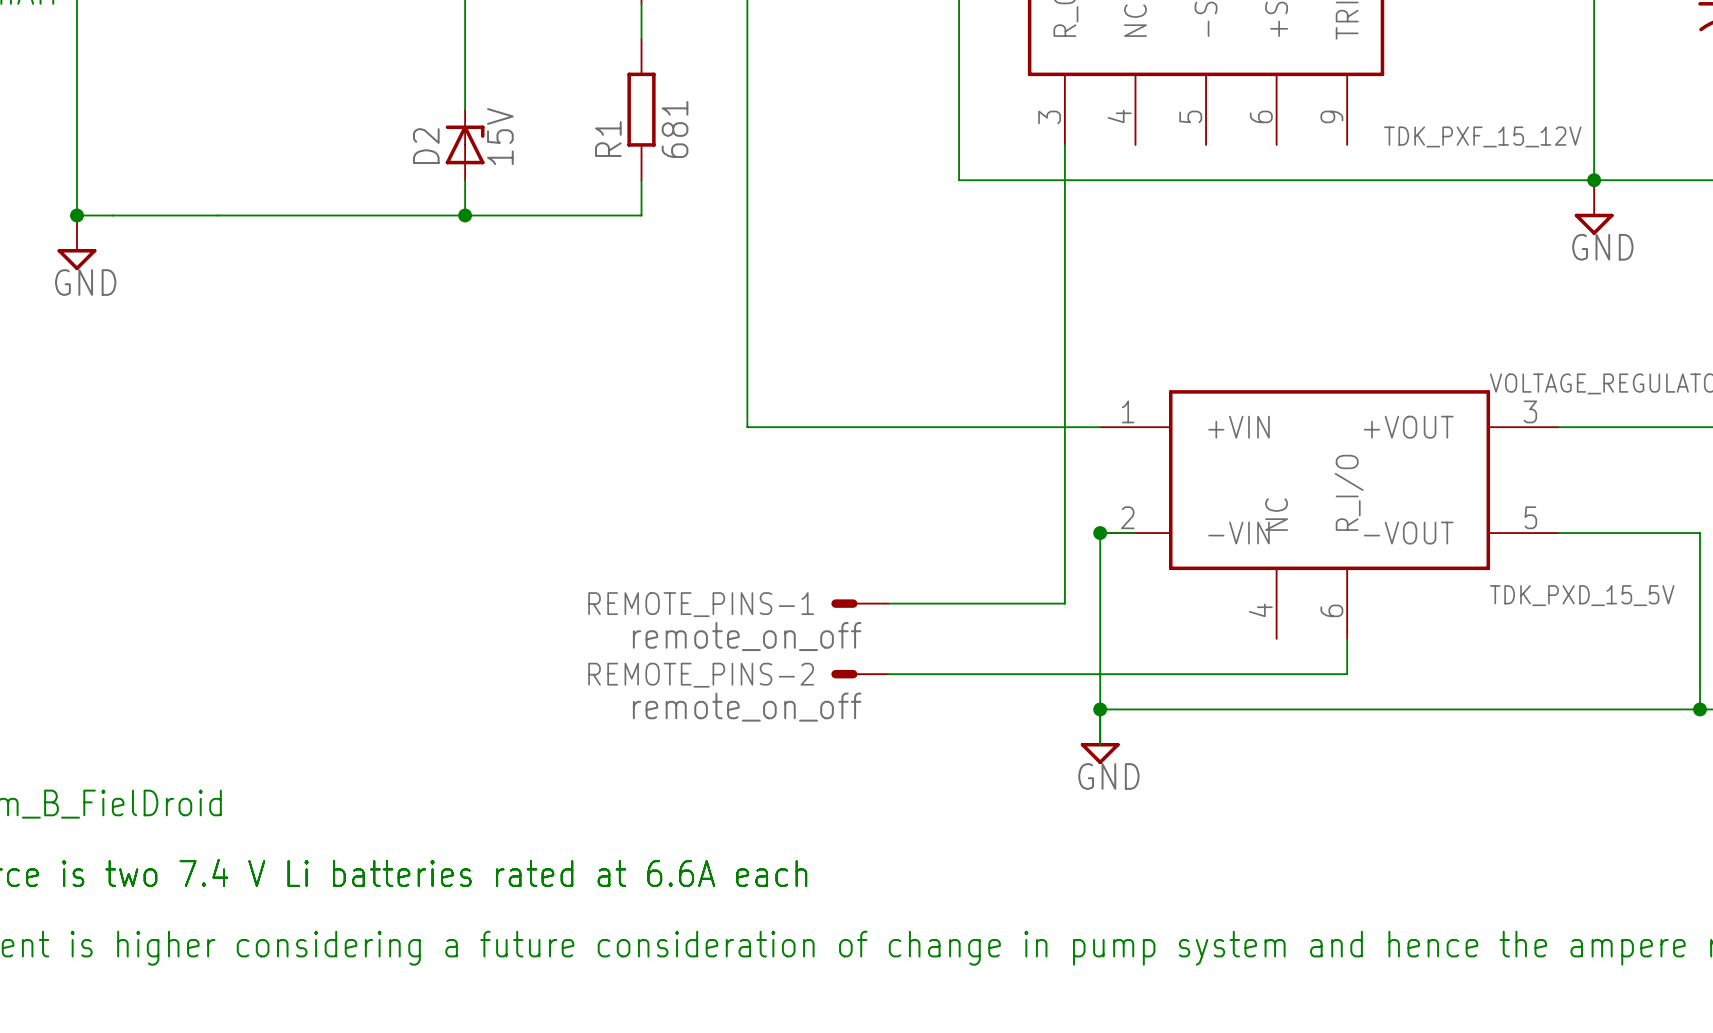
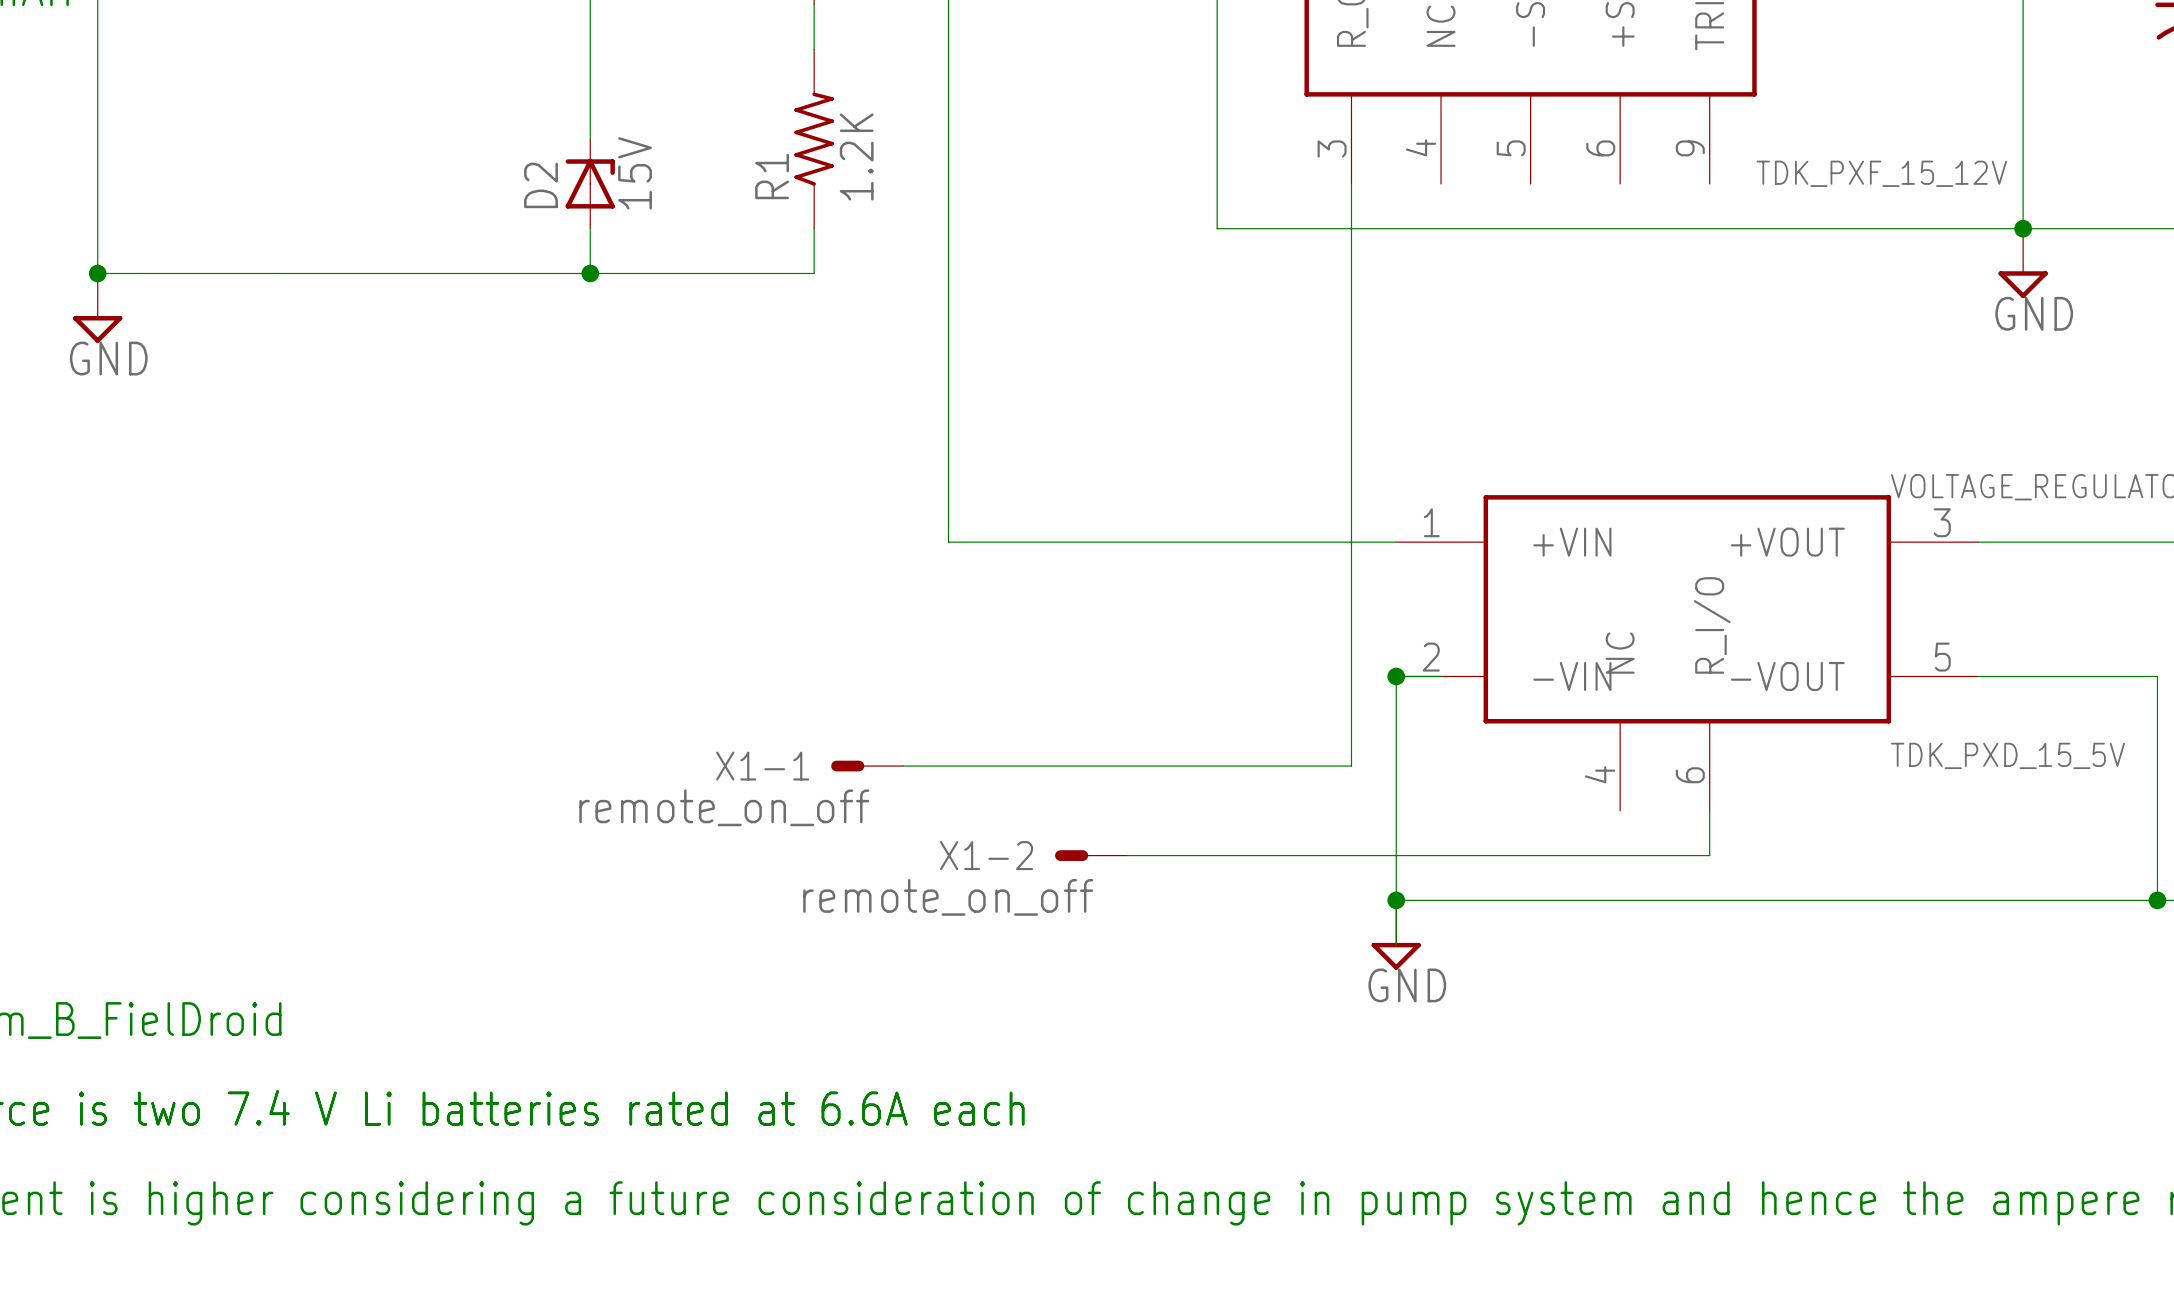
R1 symbol: [627, 39, 656, 181] -> [794, 49, 834, 229]
R1 value: 681 (675, 129) -> 1.2K (856, 156)
X1-1: none -> remote_on_off (867, 766)
wire: none -> (903, 766) (1127, 766)
REMOTE_PINS-1: remote_on_off (859, 603) -> none
REMOTE_PINS-2 name: REMOTE_PINS-2 (701, 675) -> X1-2 (986, 855)

